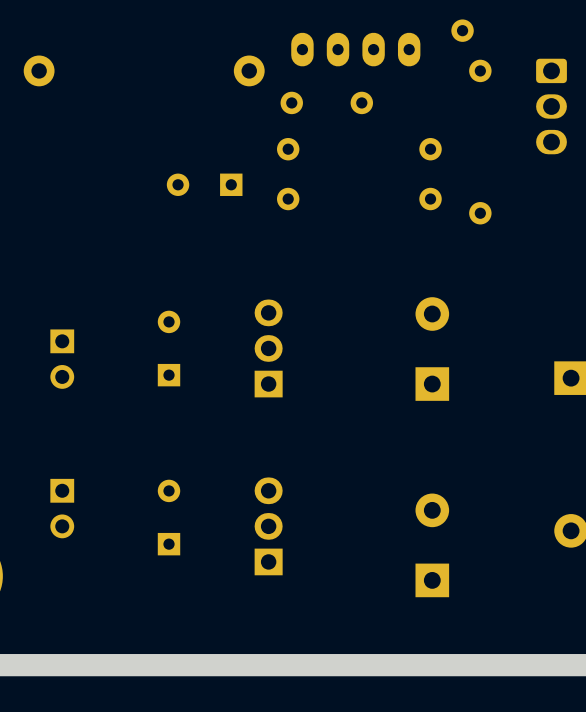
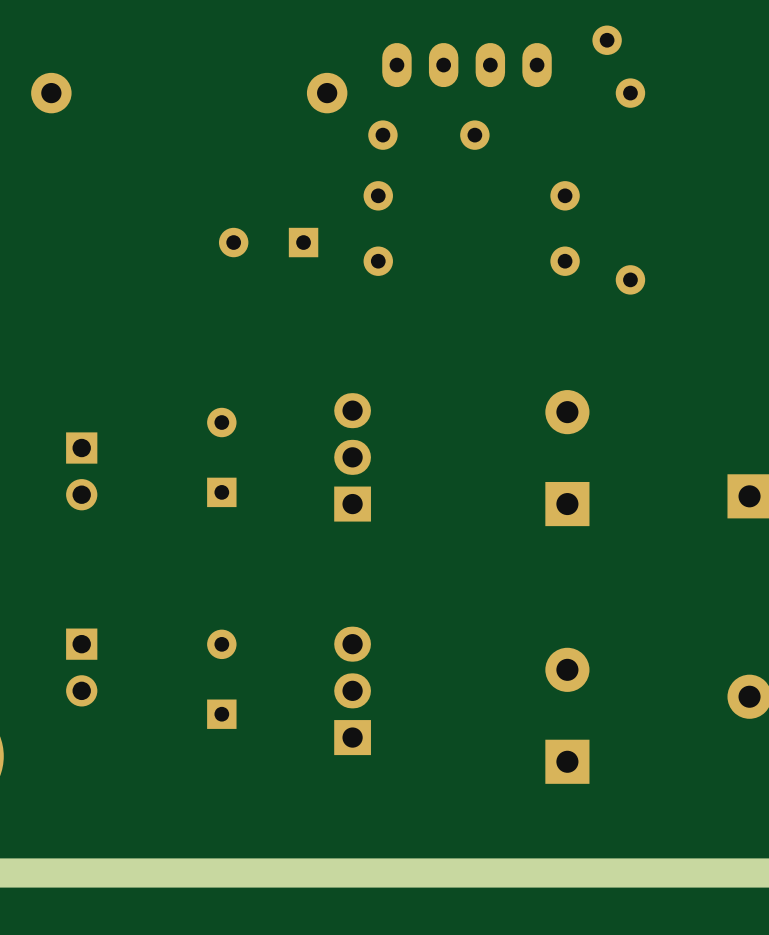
part: (551, 106) -> none

